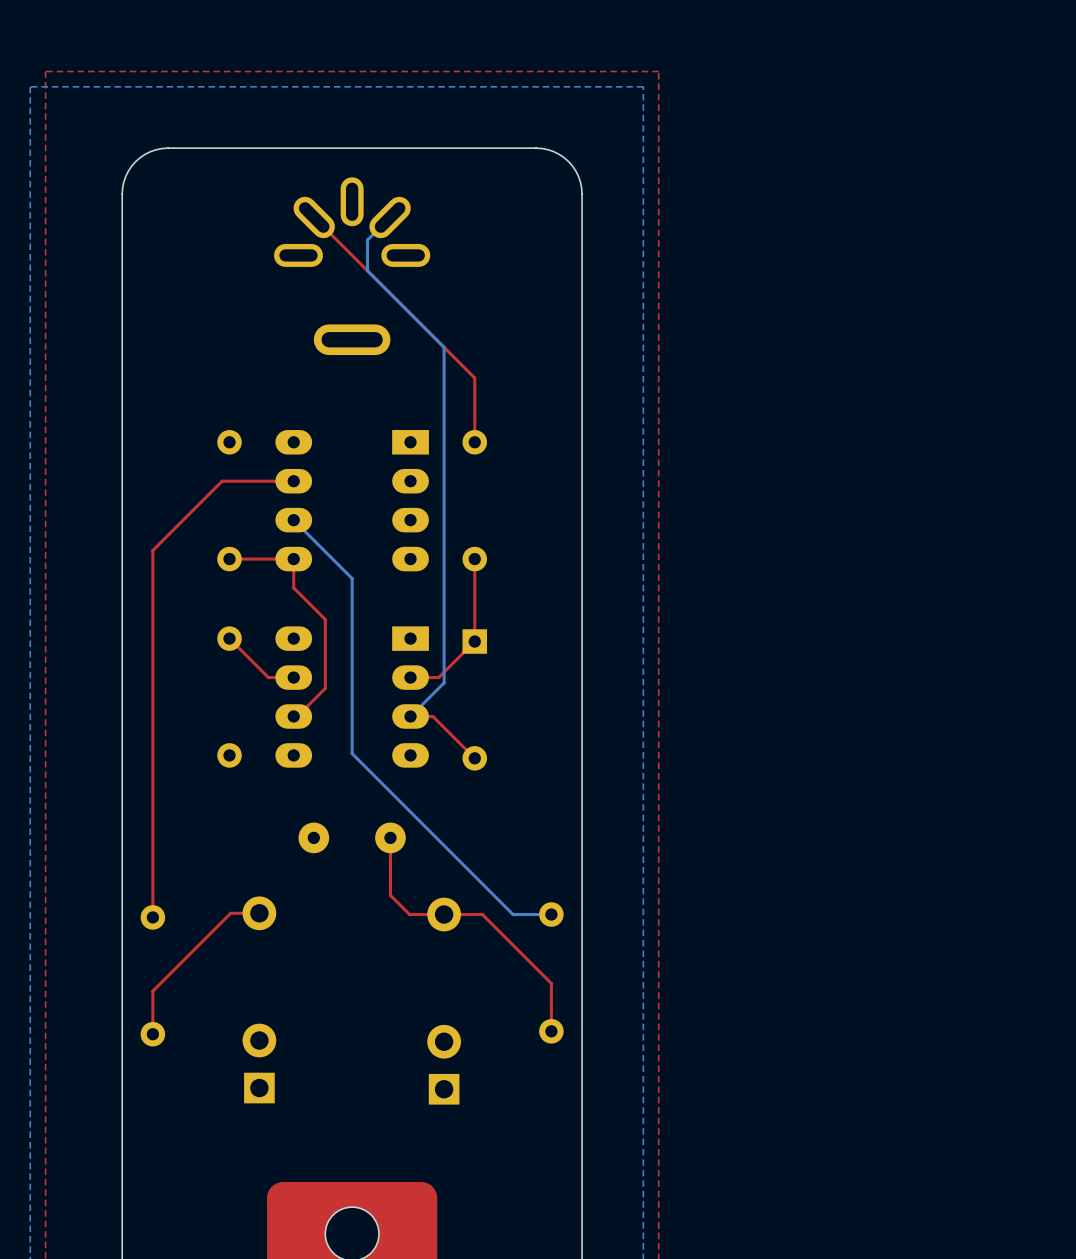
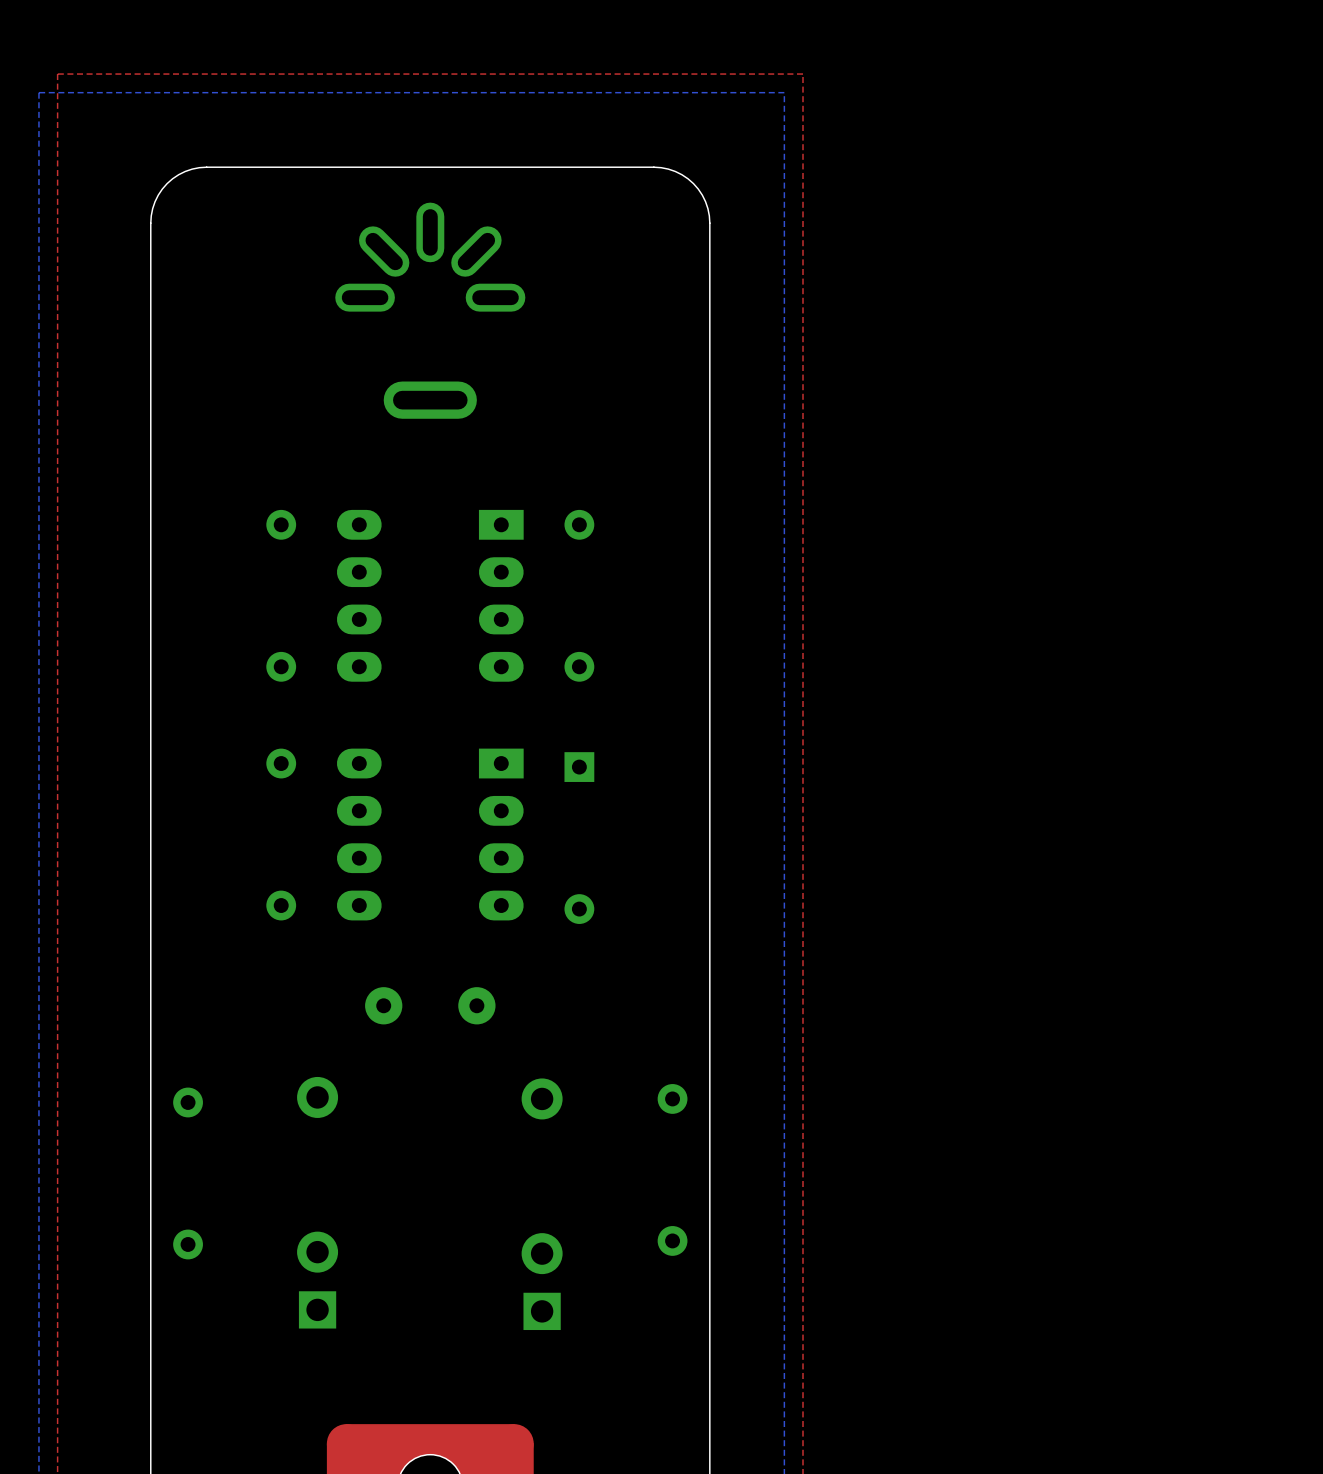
top track: (314, 217) (474, 378) (474, 442) -> none
bottom track: (390, 217) (367, 240) (367, 270) (444, 347) (444, 682) (410, 716) -> none
top track: (293, 481) (222, 481) (152, 550) (152, 917) -> none
bottom track: (293, 520) (352, 578) (352, 753) (513, 914) (551, 914) -> none
top track: (229, 559) (293, 559) (293, 587) (325, 619) (325, 688) (297, 716) (293, 716) -> none
top track: (474, 559) (474, 641) (438, 677) (410, 677) -> none
top track: (229, 638) (268, 677) (293, 677) -> none
top track: (410, 716) (432, 716) (474, 758) -> none
top track: (390, 837) (390, 895) (409, 914) (482, 914) (551, 983) (551, 1031) -> none
top track: (259, 913) (230, 913) (152, 991) (152, 1034) -> none

